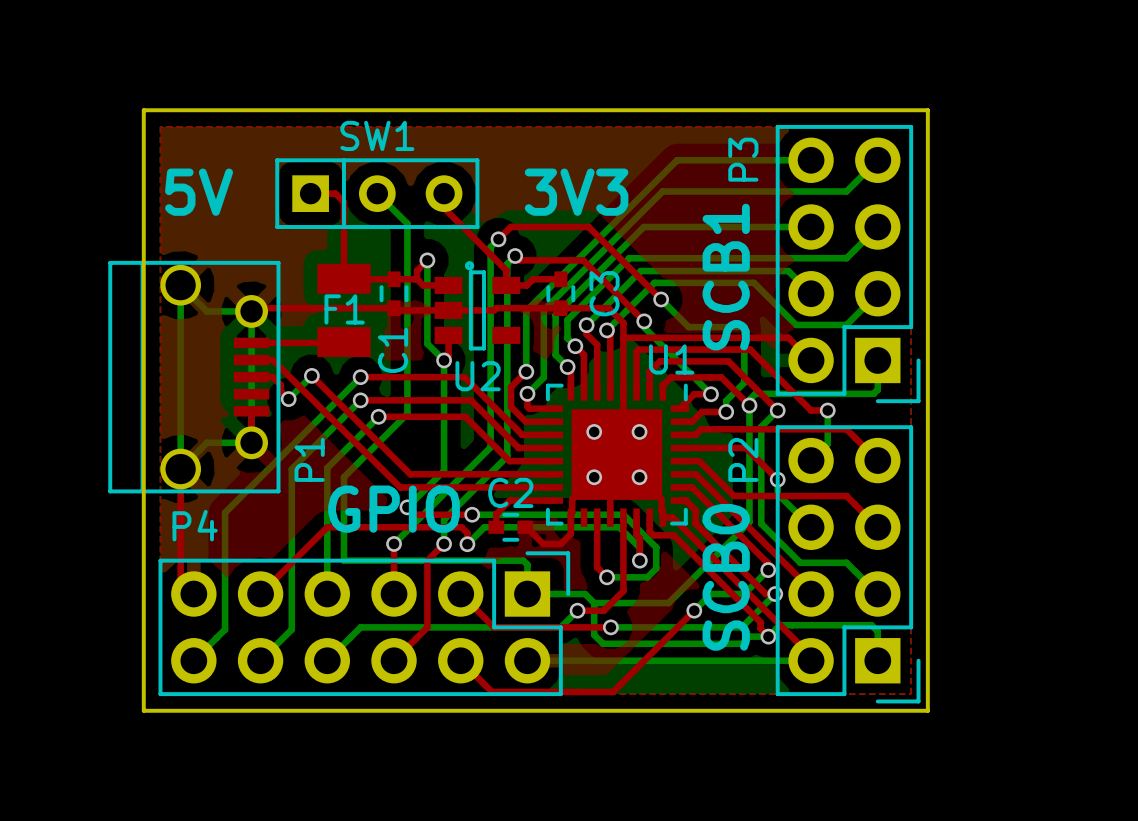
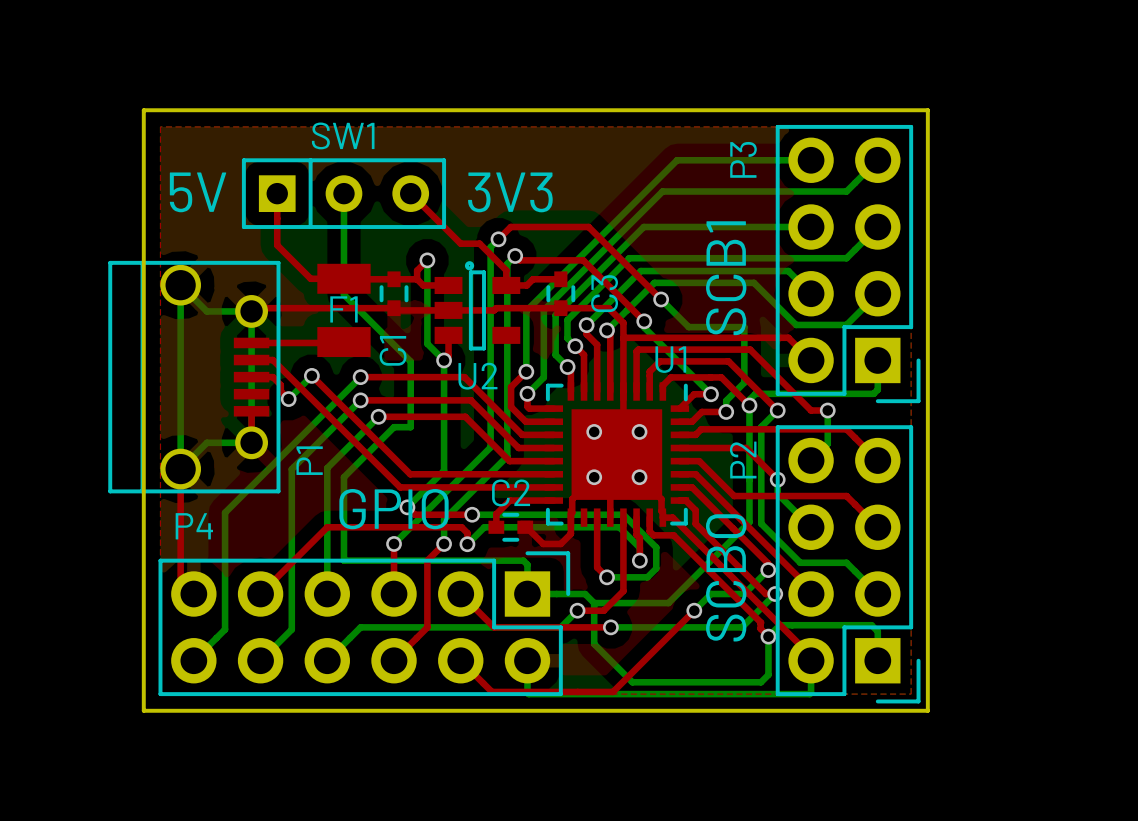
text position: 3V3 (576, 192) -> 3V3 (510, 192)
top track: (310, 193) (335, 193) (343, 202) (343, 278) -> (277, 193) (277, 245) (310, 278) (343, 278)
bottom track: (377, 193) (407, 223) (407, 413) (394, 427) -> (343, 193) (343, 294) (410, 361) (410, 427) (394, 427)
SW1 position: (377, 193) -> (343, 193)
top track: (444, 193) (444, 208) (479, 243) -> (410, 193) (460, 243) (479, 243)
bottom track: (594, 634) (603, 643) (742, 643) (749, 636) (768, 636) -> (594, 634) (594, 644) (632, 682) (761, 682) (768, 674) (768, 636)
bottom track: (527, 660) (811, 660) -> (527, 660) (528, 694) (809, 694) (811, 660)

